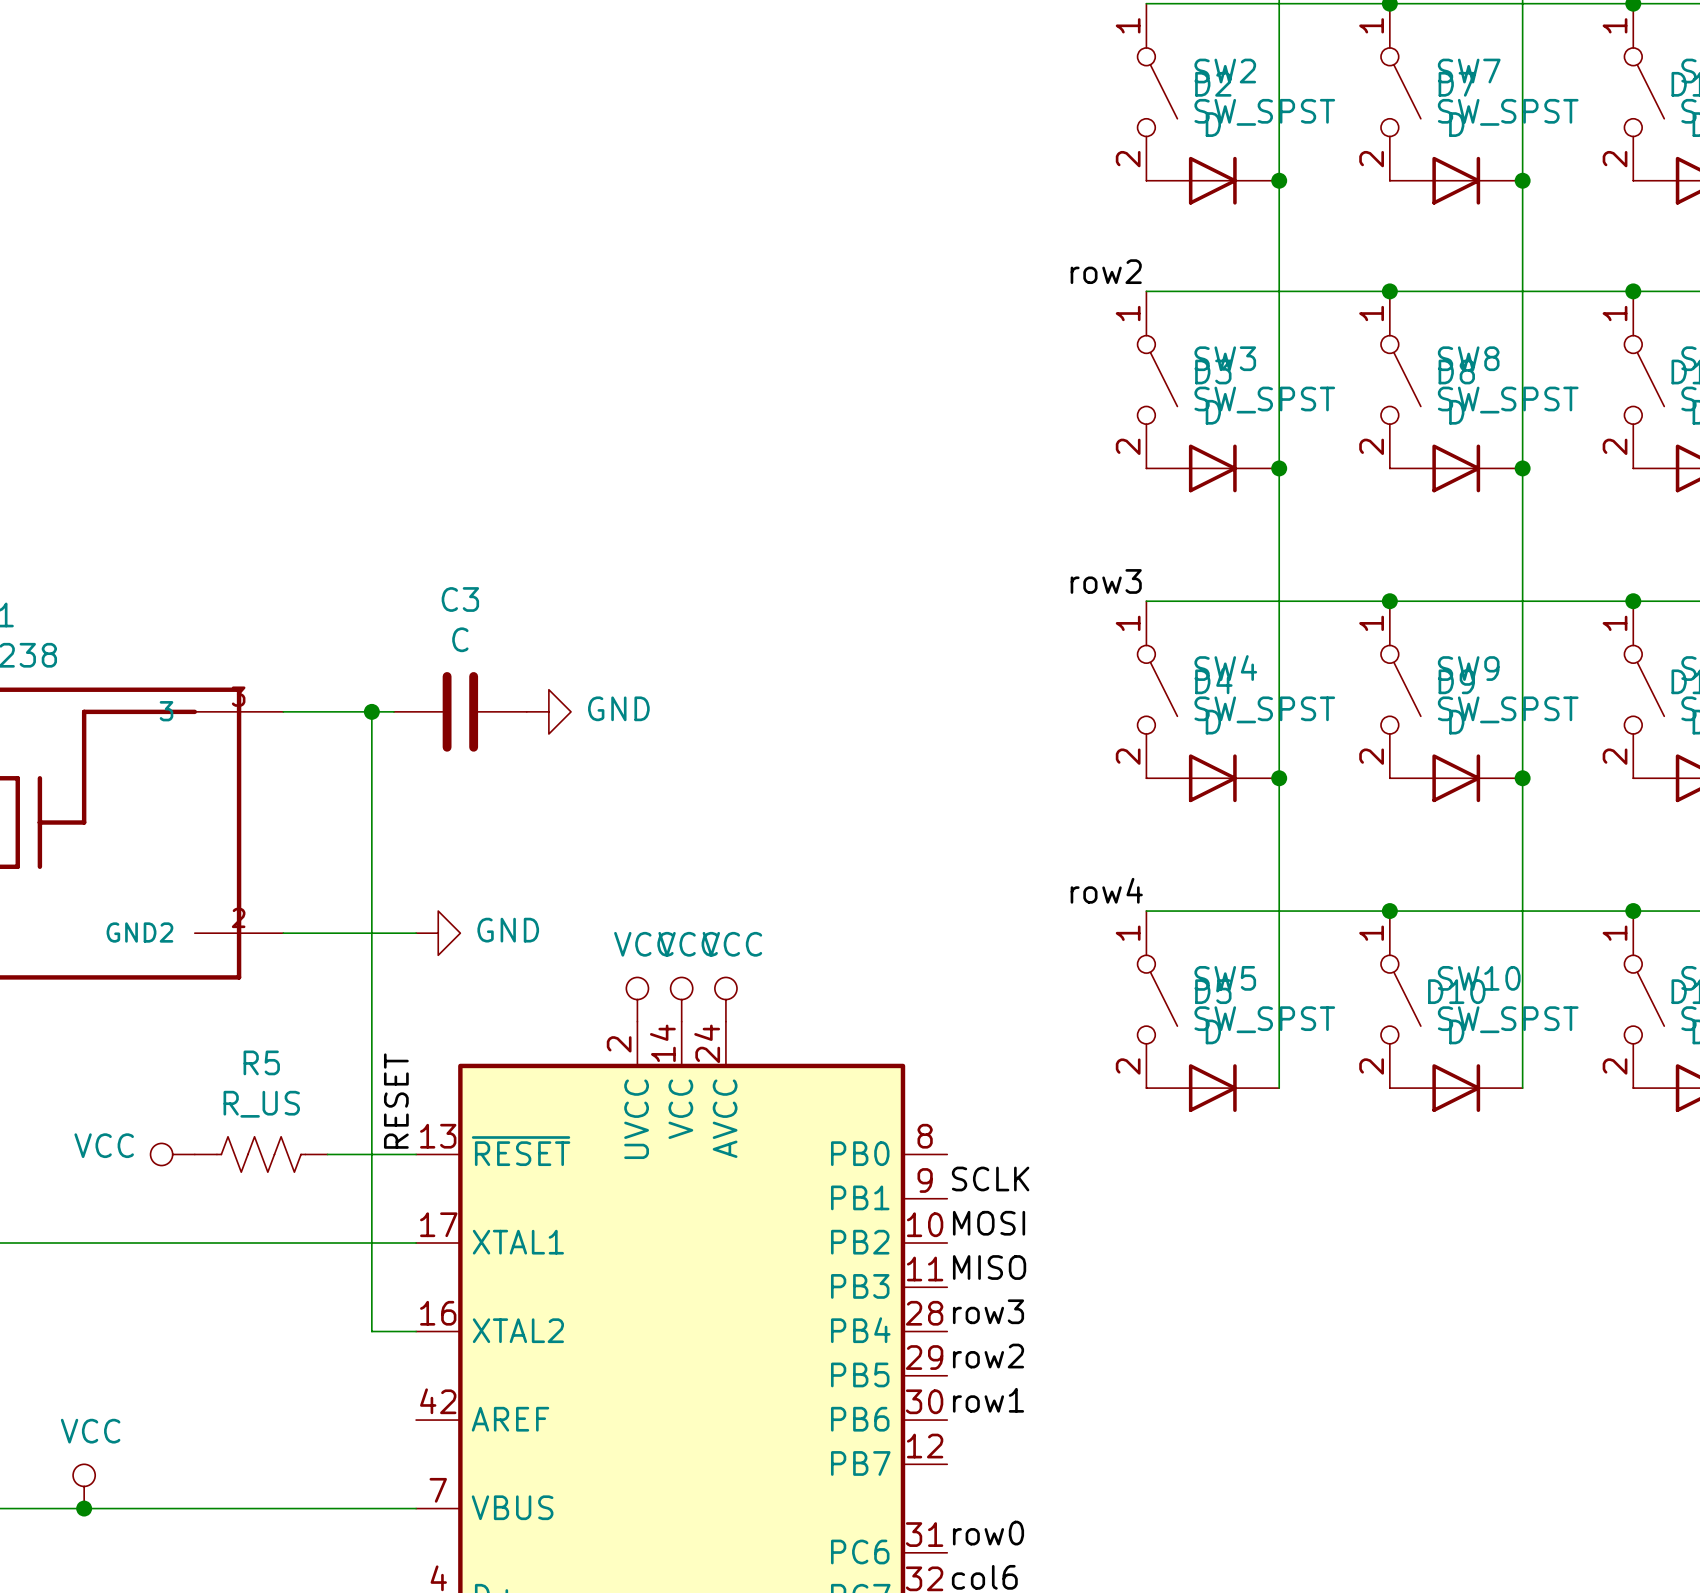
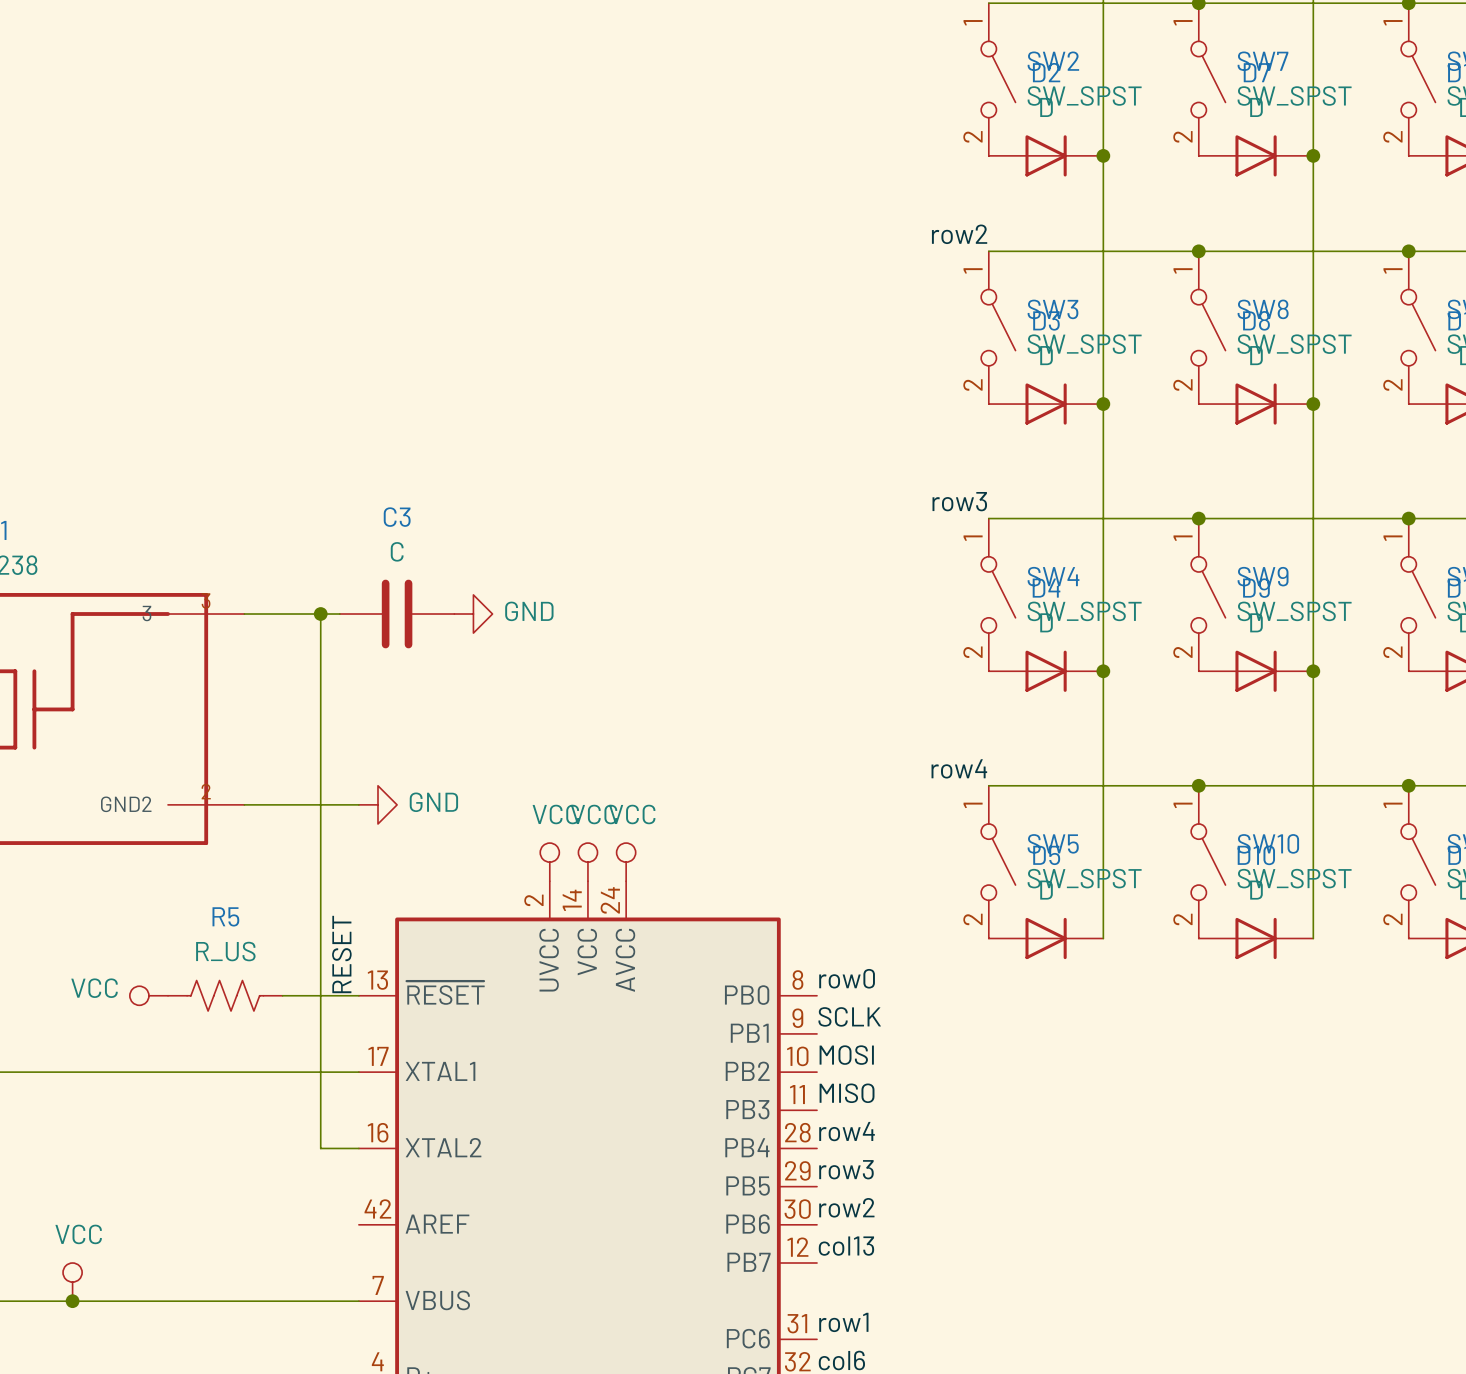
label: none -> row0 (847, 978)
label: row3 (988, 1311) -> row4 (847, 1131)
label: row2 (988, 1356) -> row3 (846, 1169)
label: row1 (988, 1400) -> row2 (846, 1207)
label: none -> col13 (846, 1246)
label: row0 (988, 1533) -> row1 (843, 1322)

